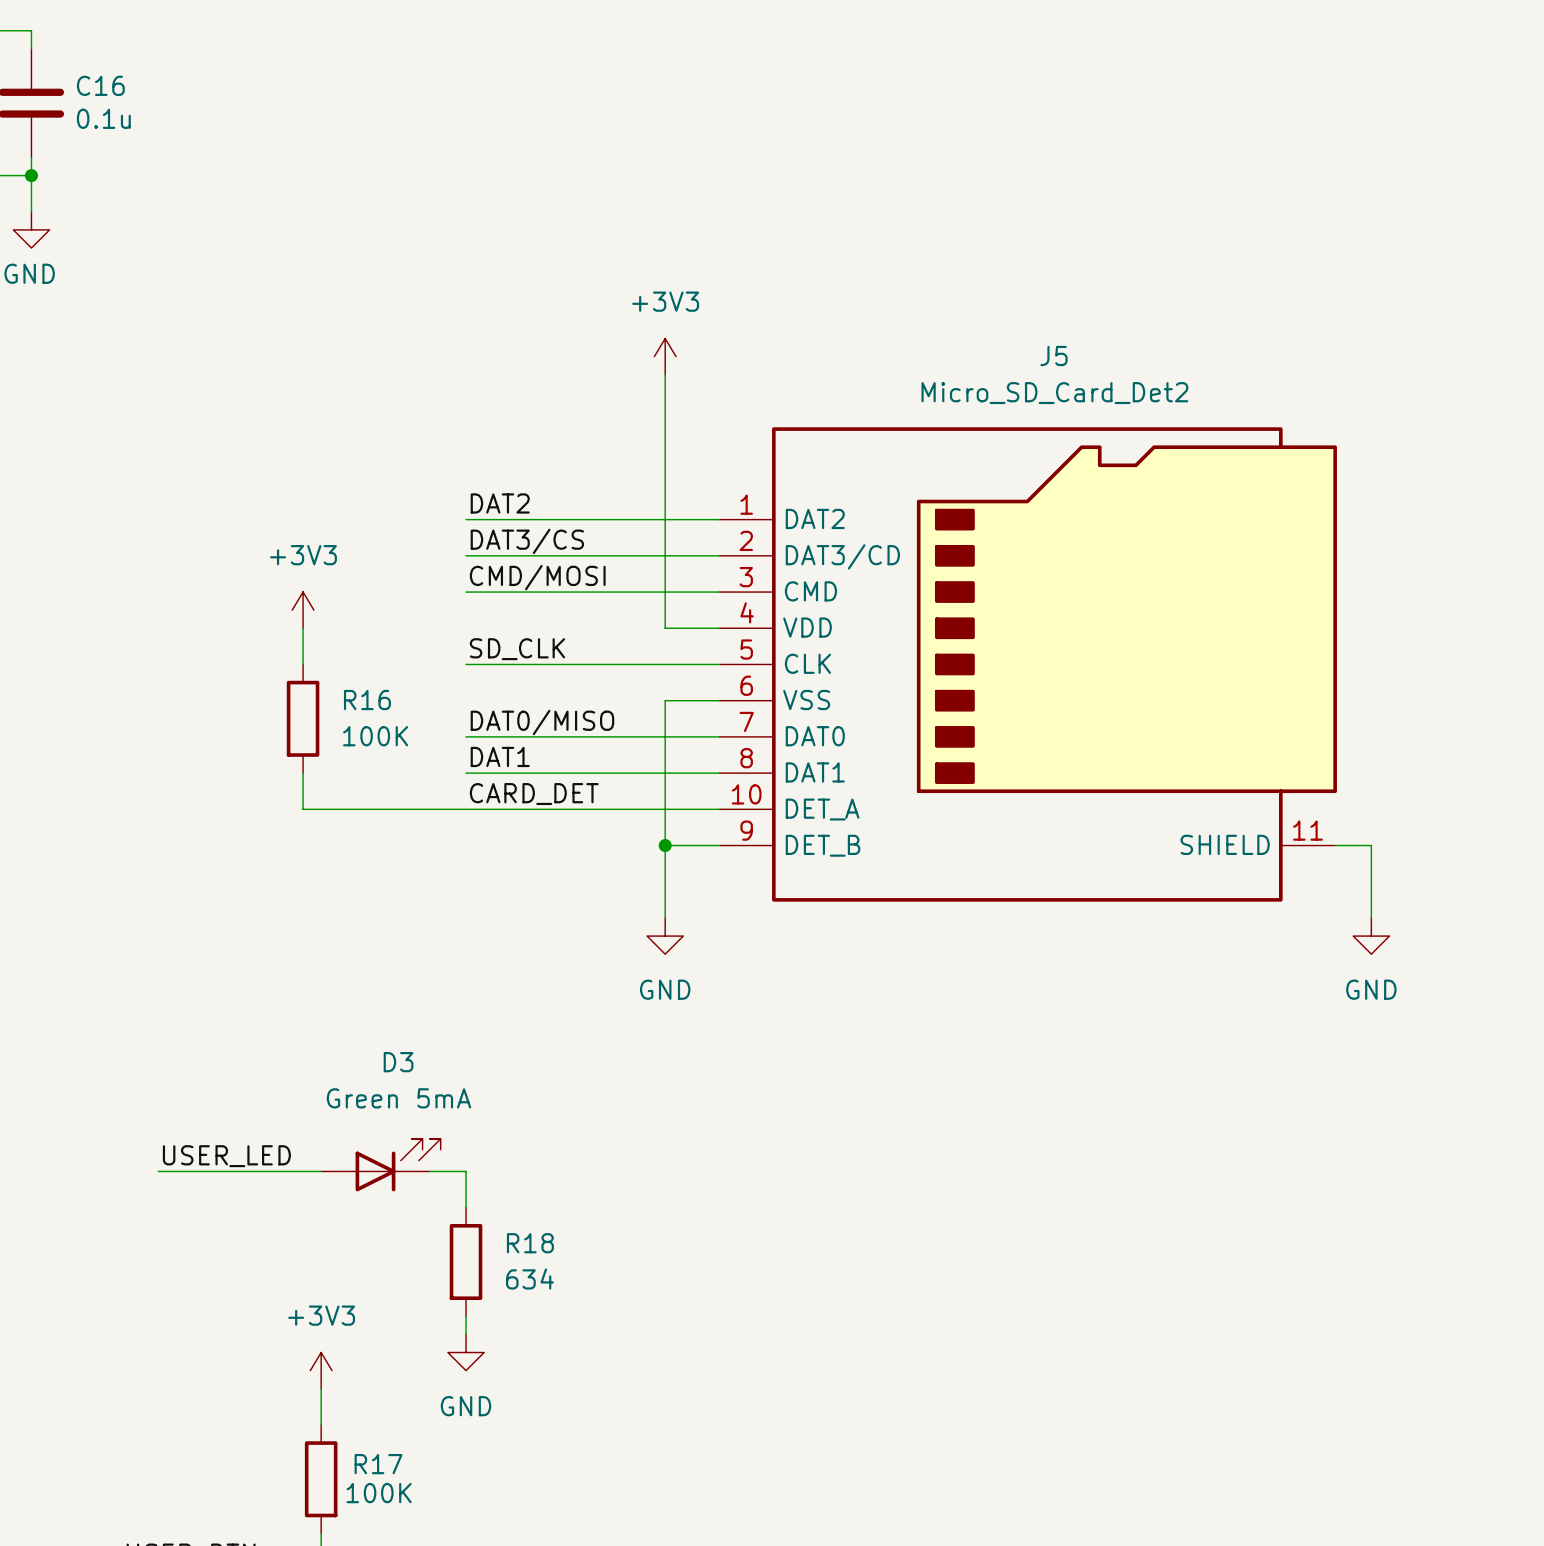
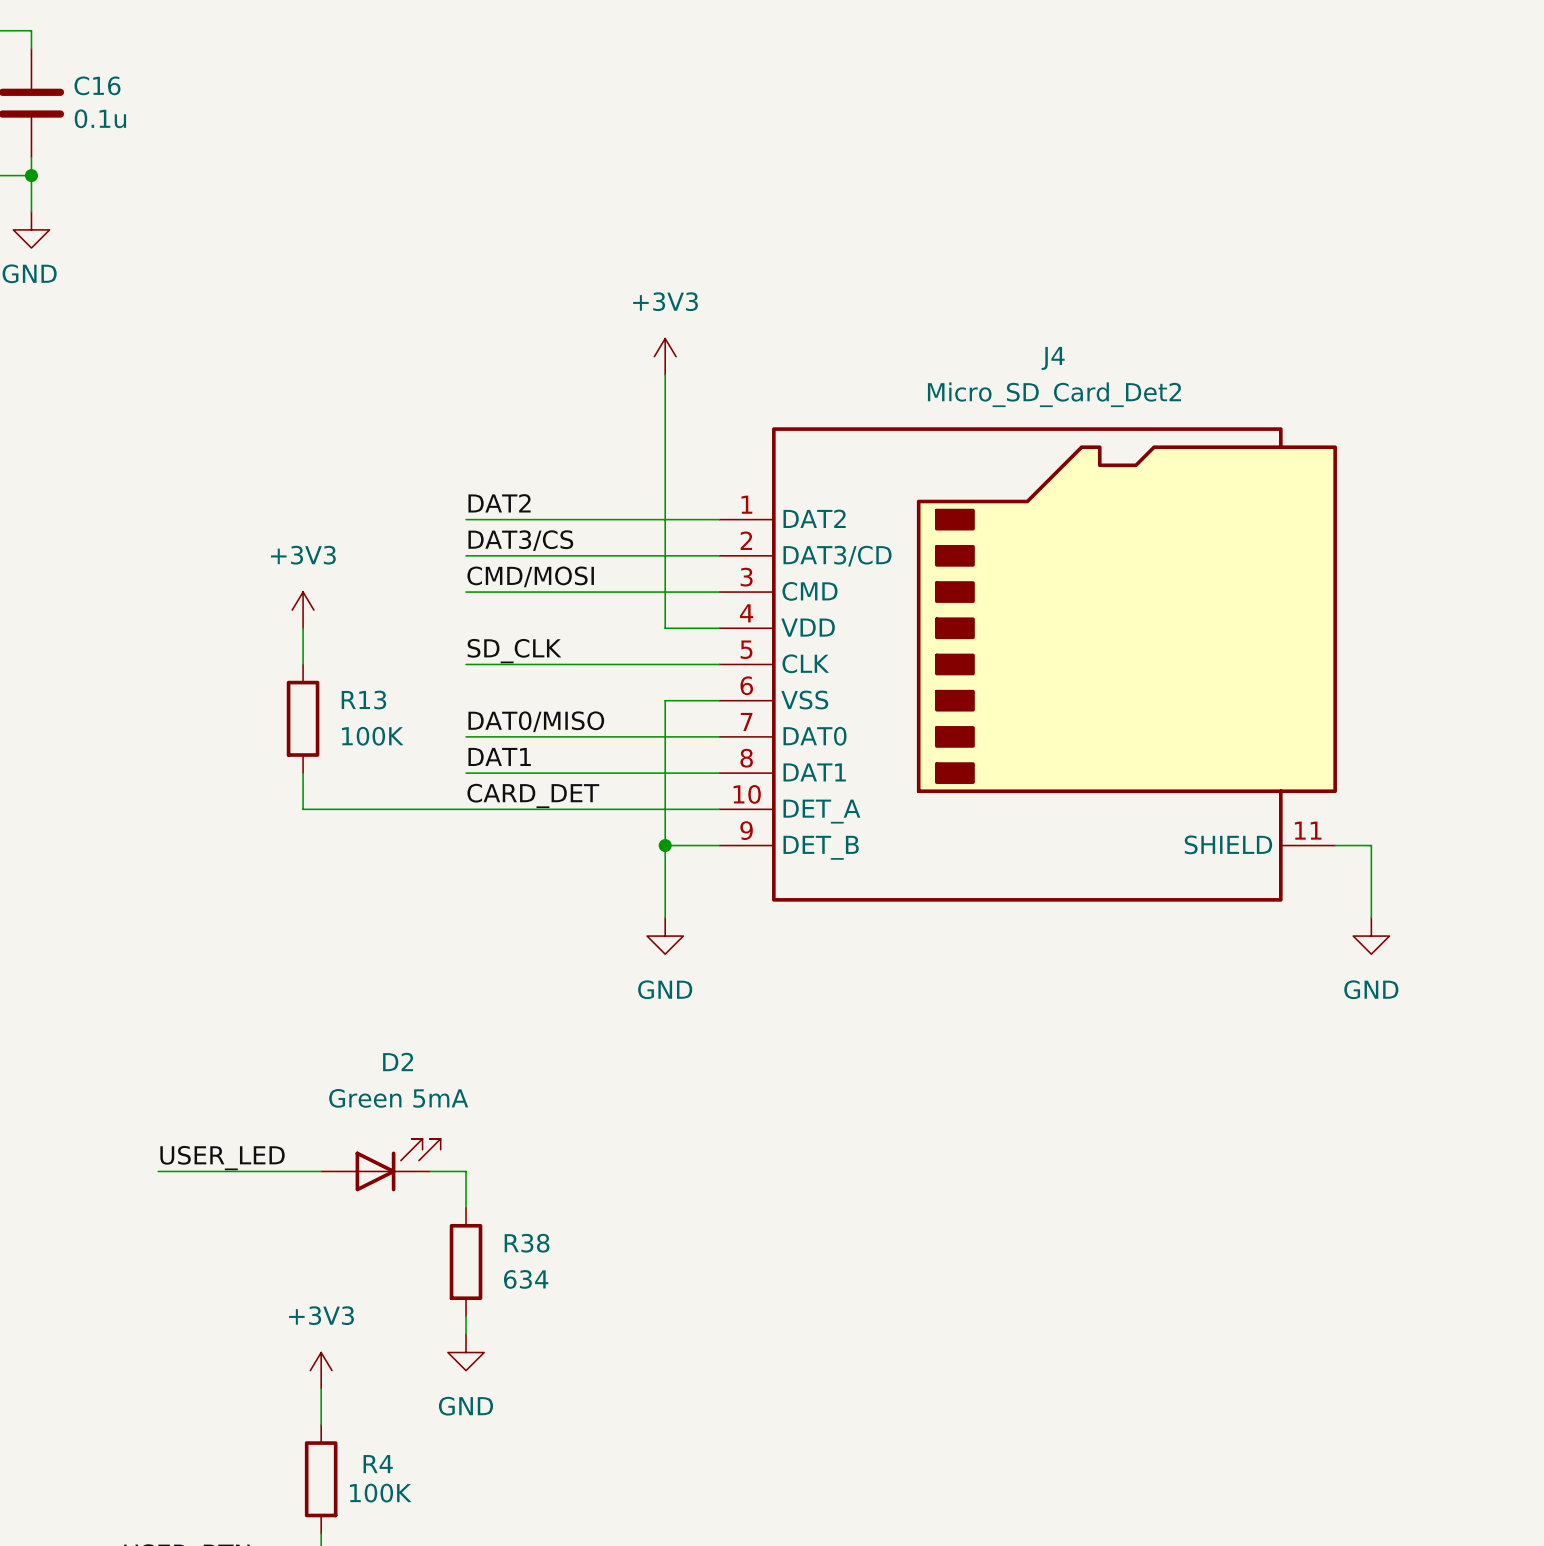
J5 name: J5 (1054, 355) -> J4 (1053, 358)
R16 name: R16 (367, 700) -> R13 (363, 700)
D3 name: D3 (398, 1062) -> D2 (398, 1061)
R18 name: R18 (530, 1243) -> R38 (527, 1243)
R17 name: R17 (378, 1464) -> R4 (378, 1464)

